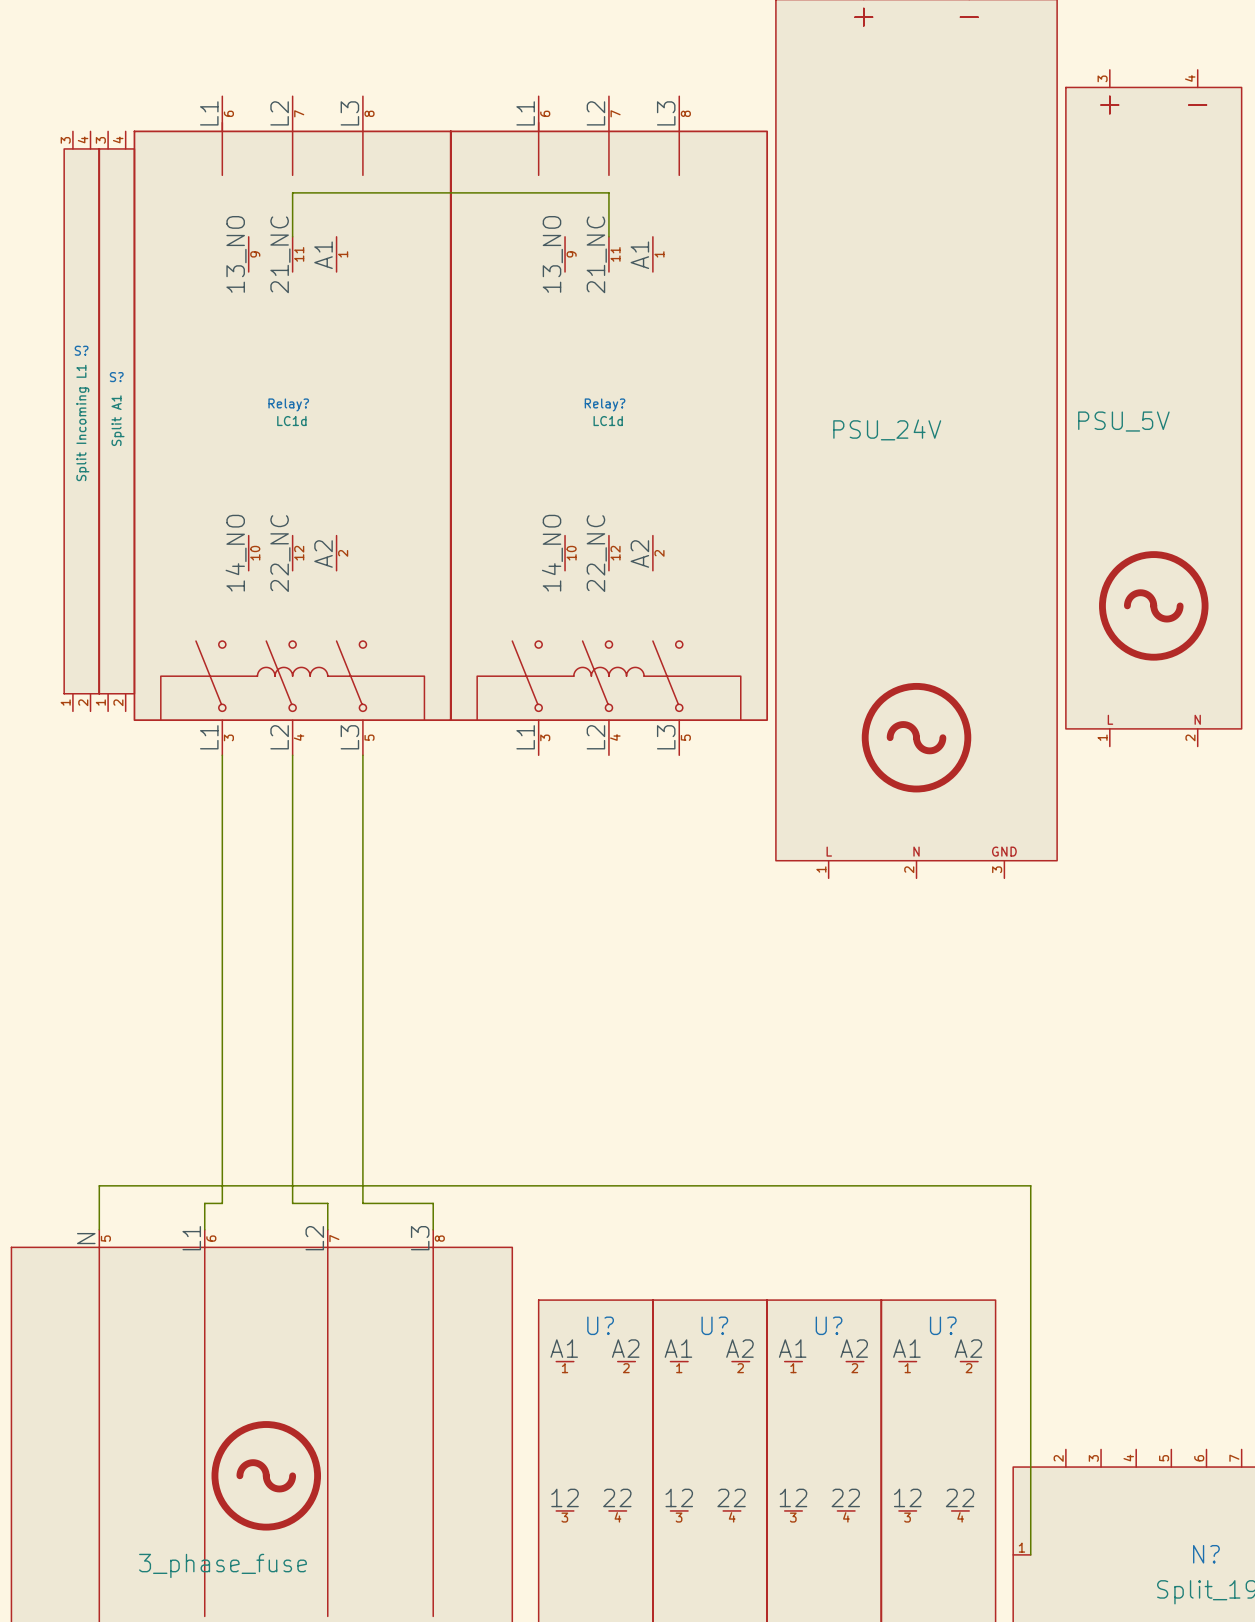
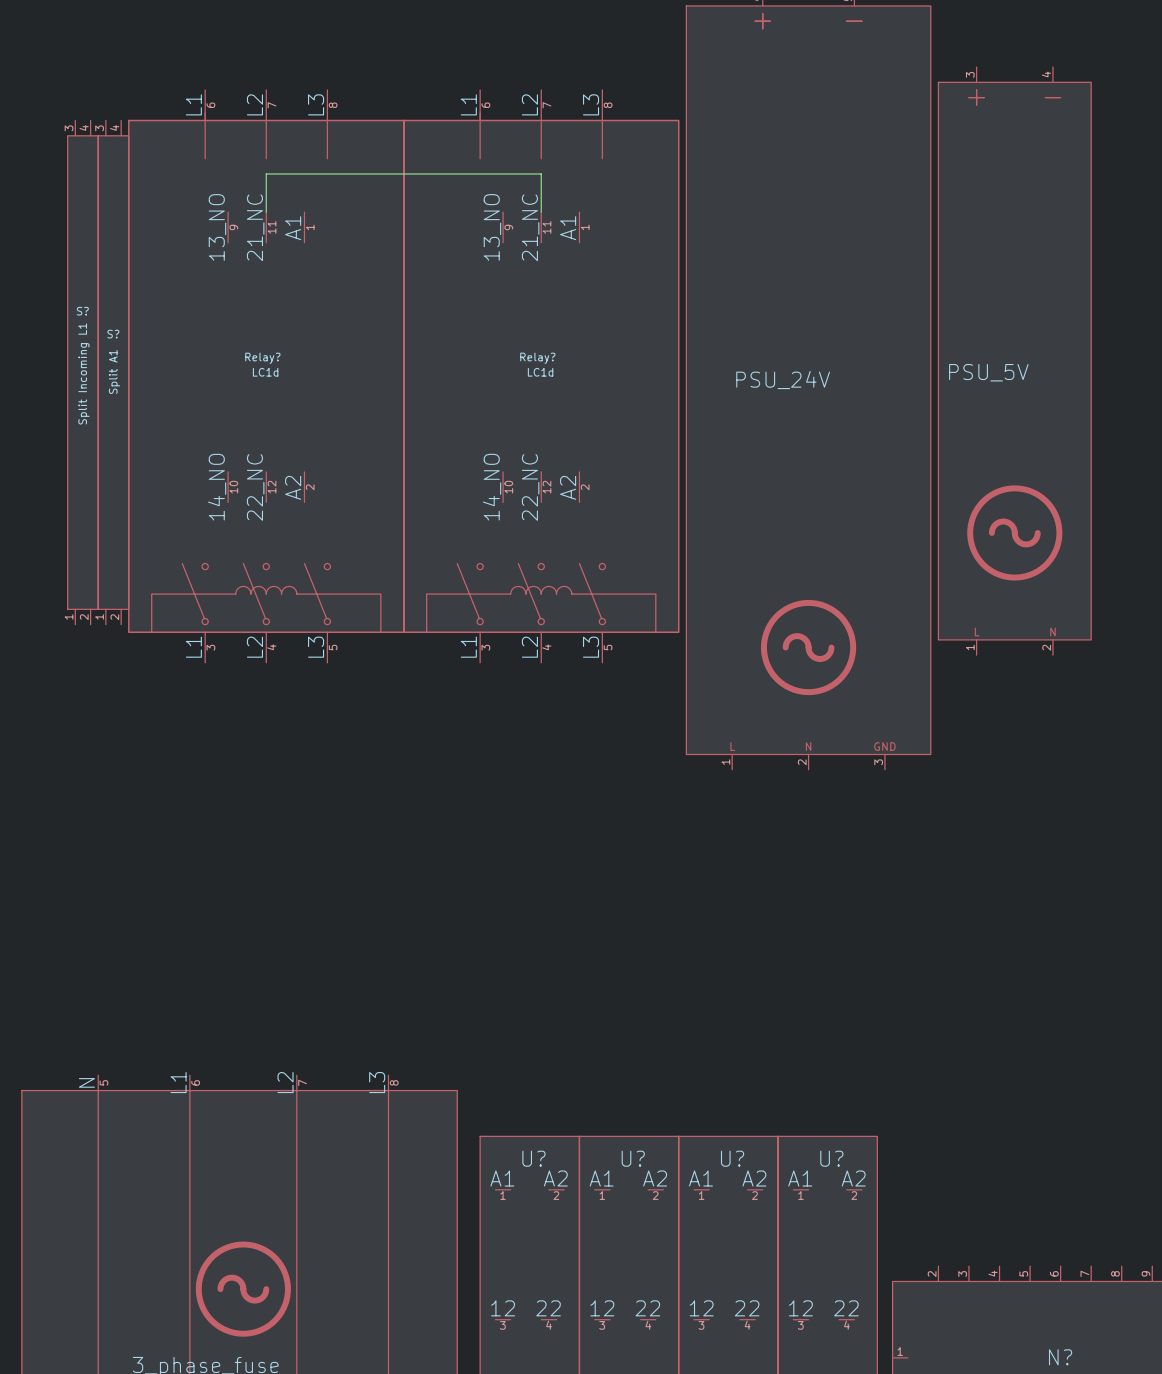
wire: (222, 755) (222, 1203) (204, 1203) (204, 1229) -> none
wire: (292, 755) (292, 1203) (327, 1203) (327, 1229) -> none
wire: (362, 755) (362, 1203) (433, 1203) (433, 1229) -> none
wire: (99, 1229) (99, 1185) (1030, 1185) (1030, 1554) -> none

